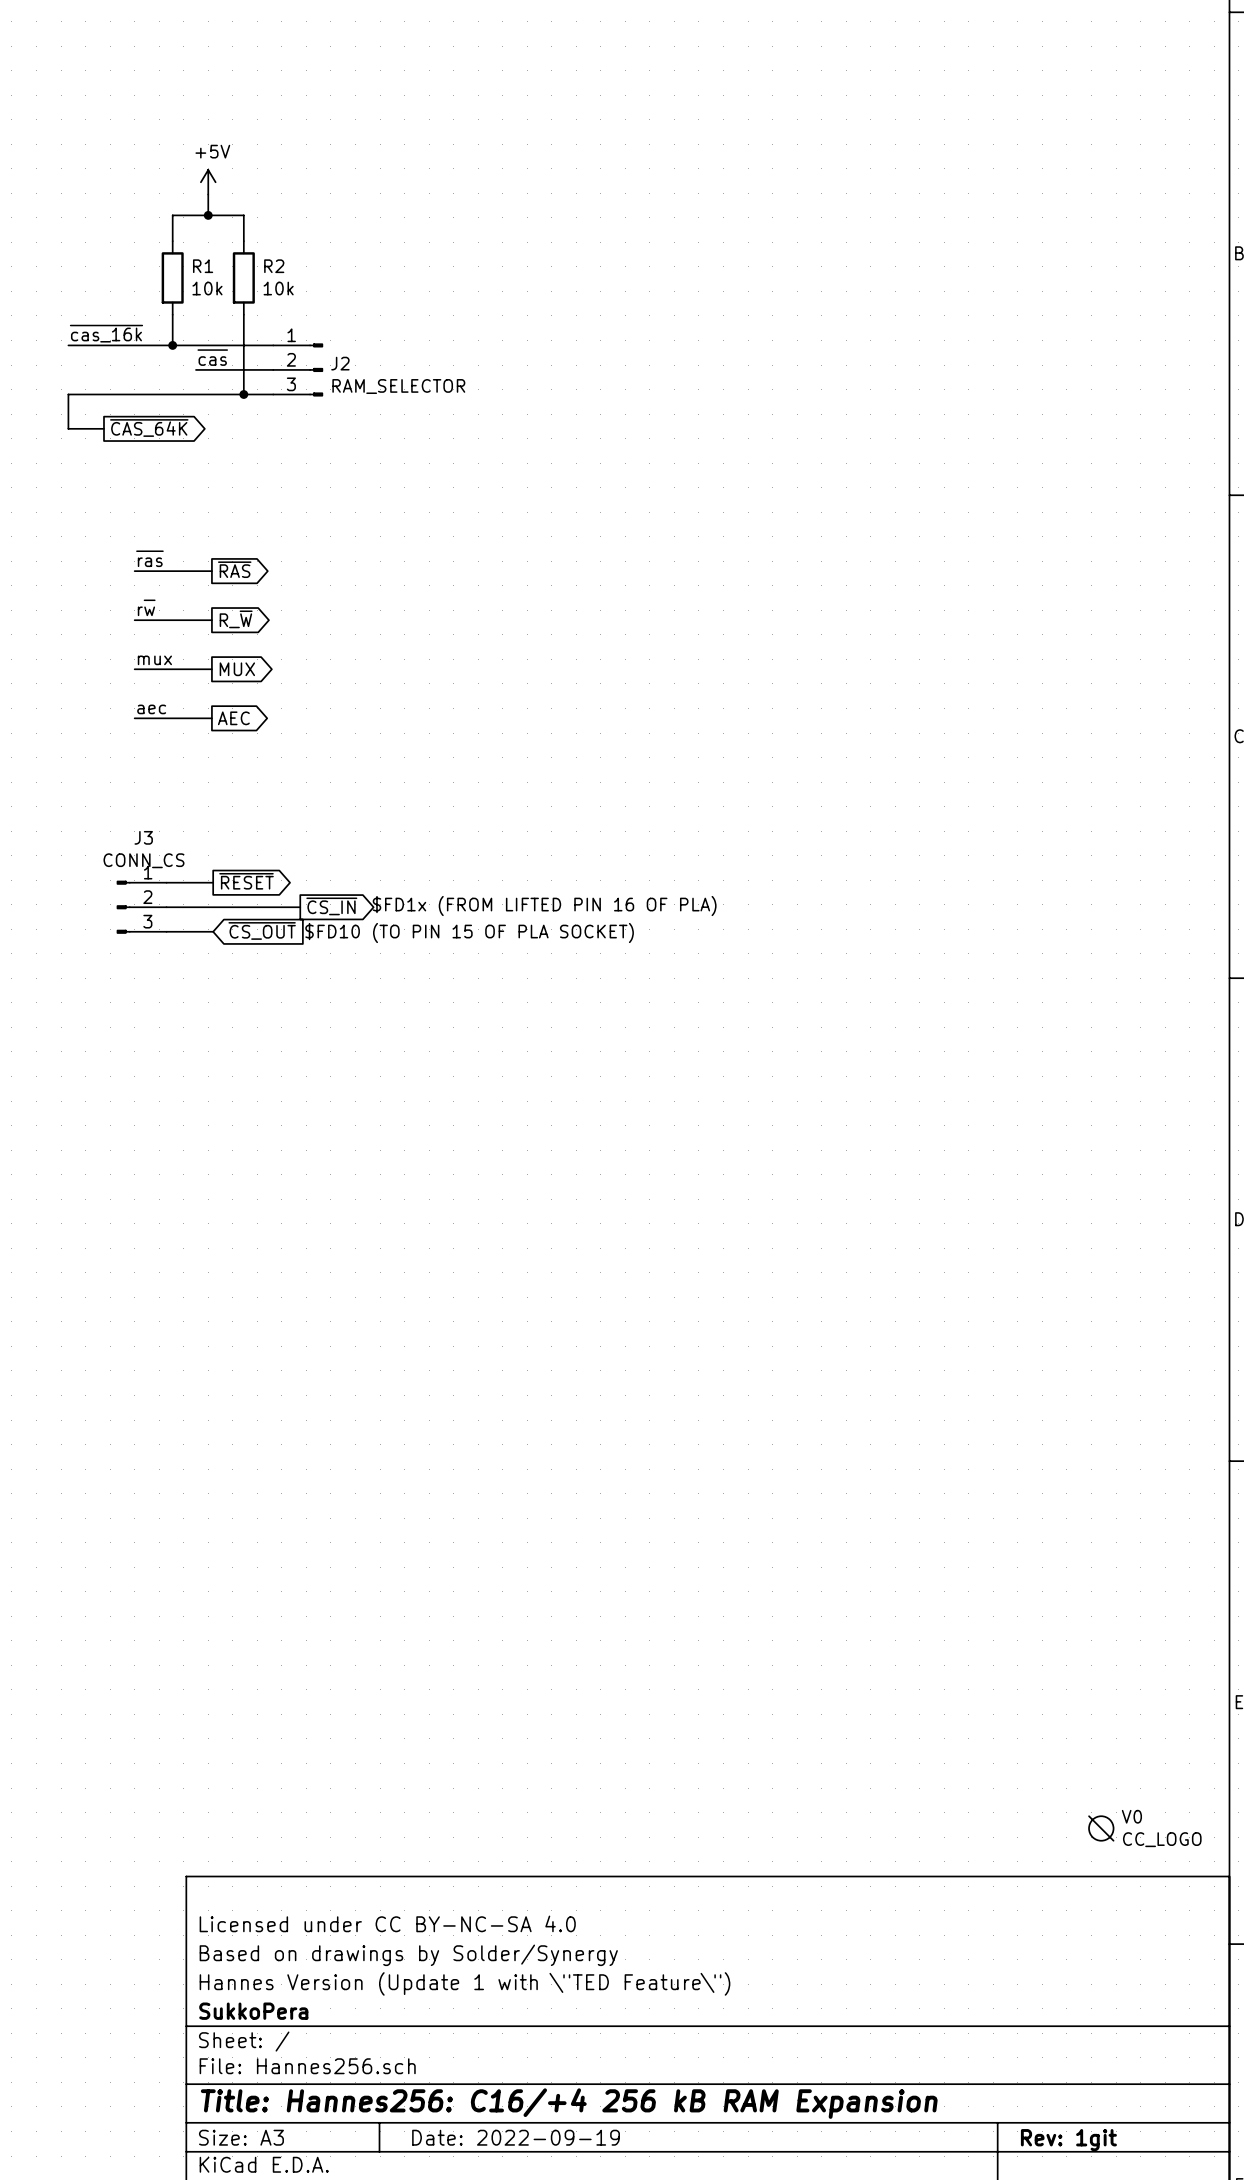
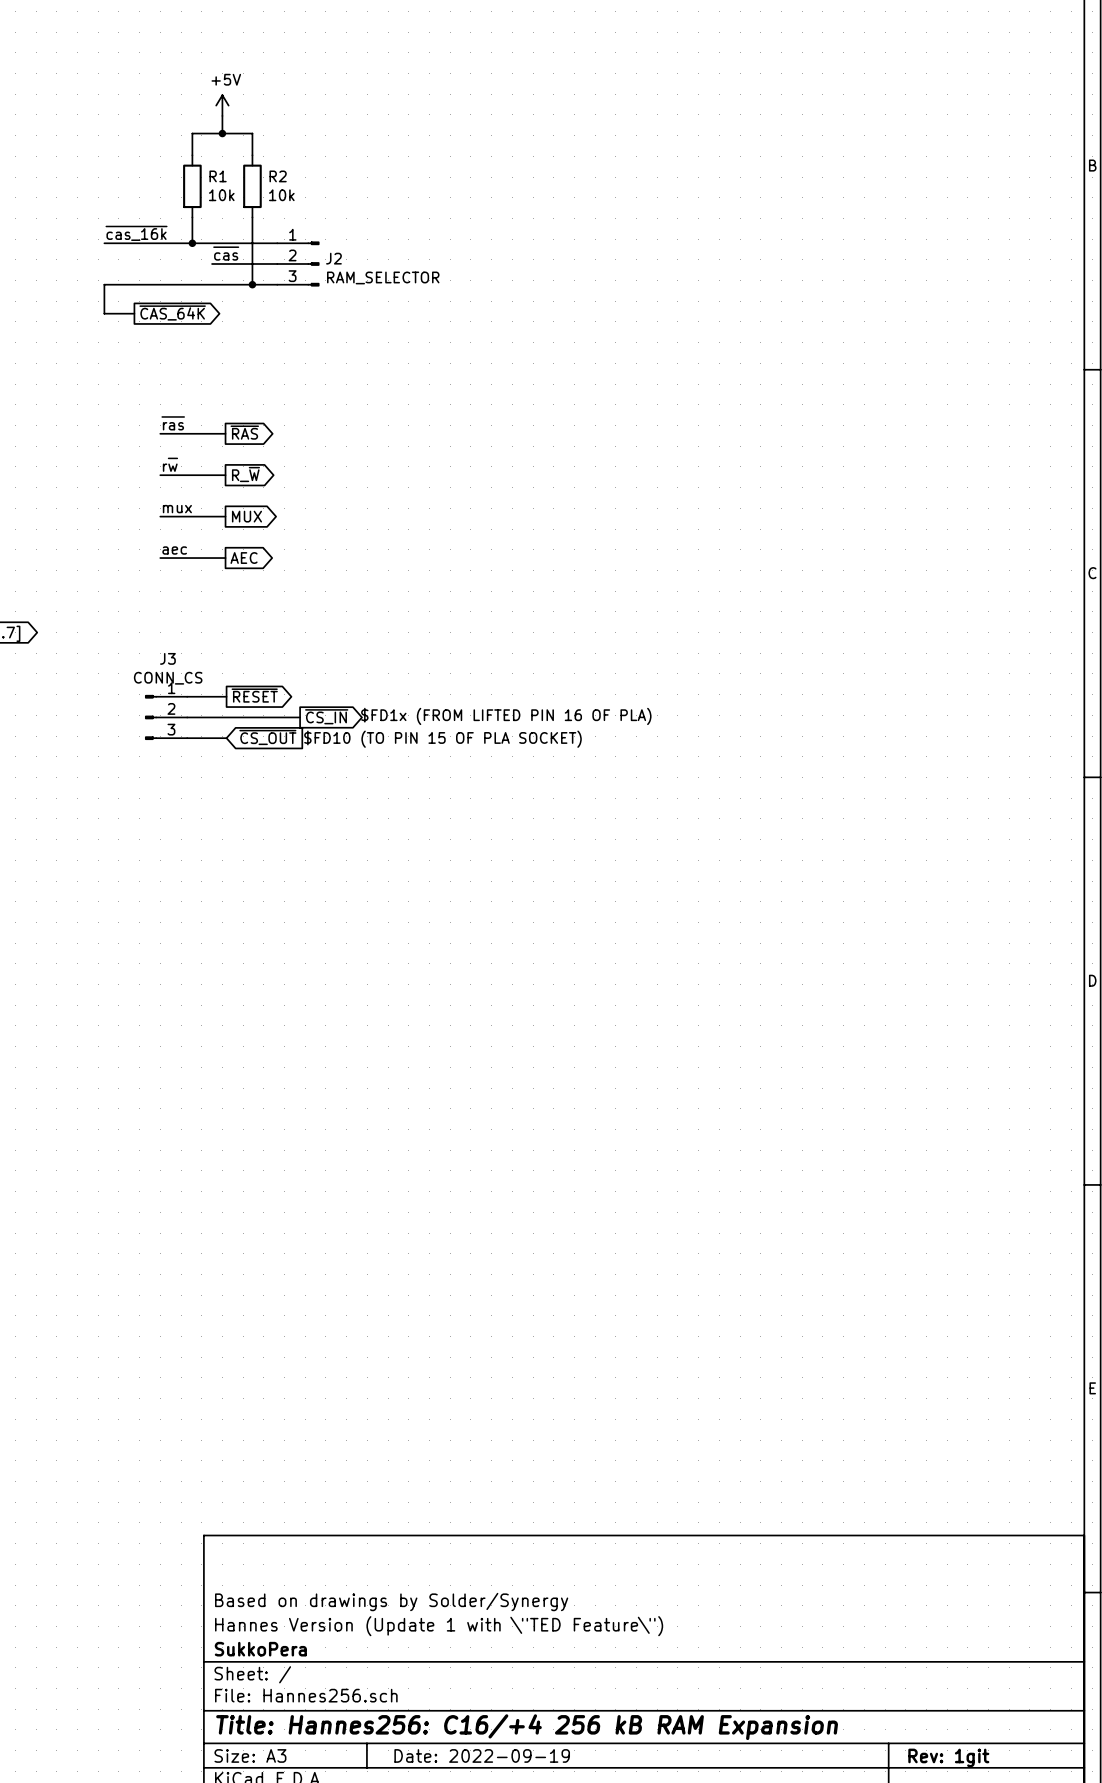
V0: CC_LOGO (1101, 1828) -> none
title block: Licensed under CC BY-NC-SA 4.0 (387, 1923) -> none

